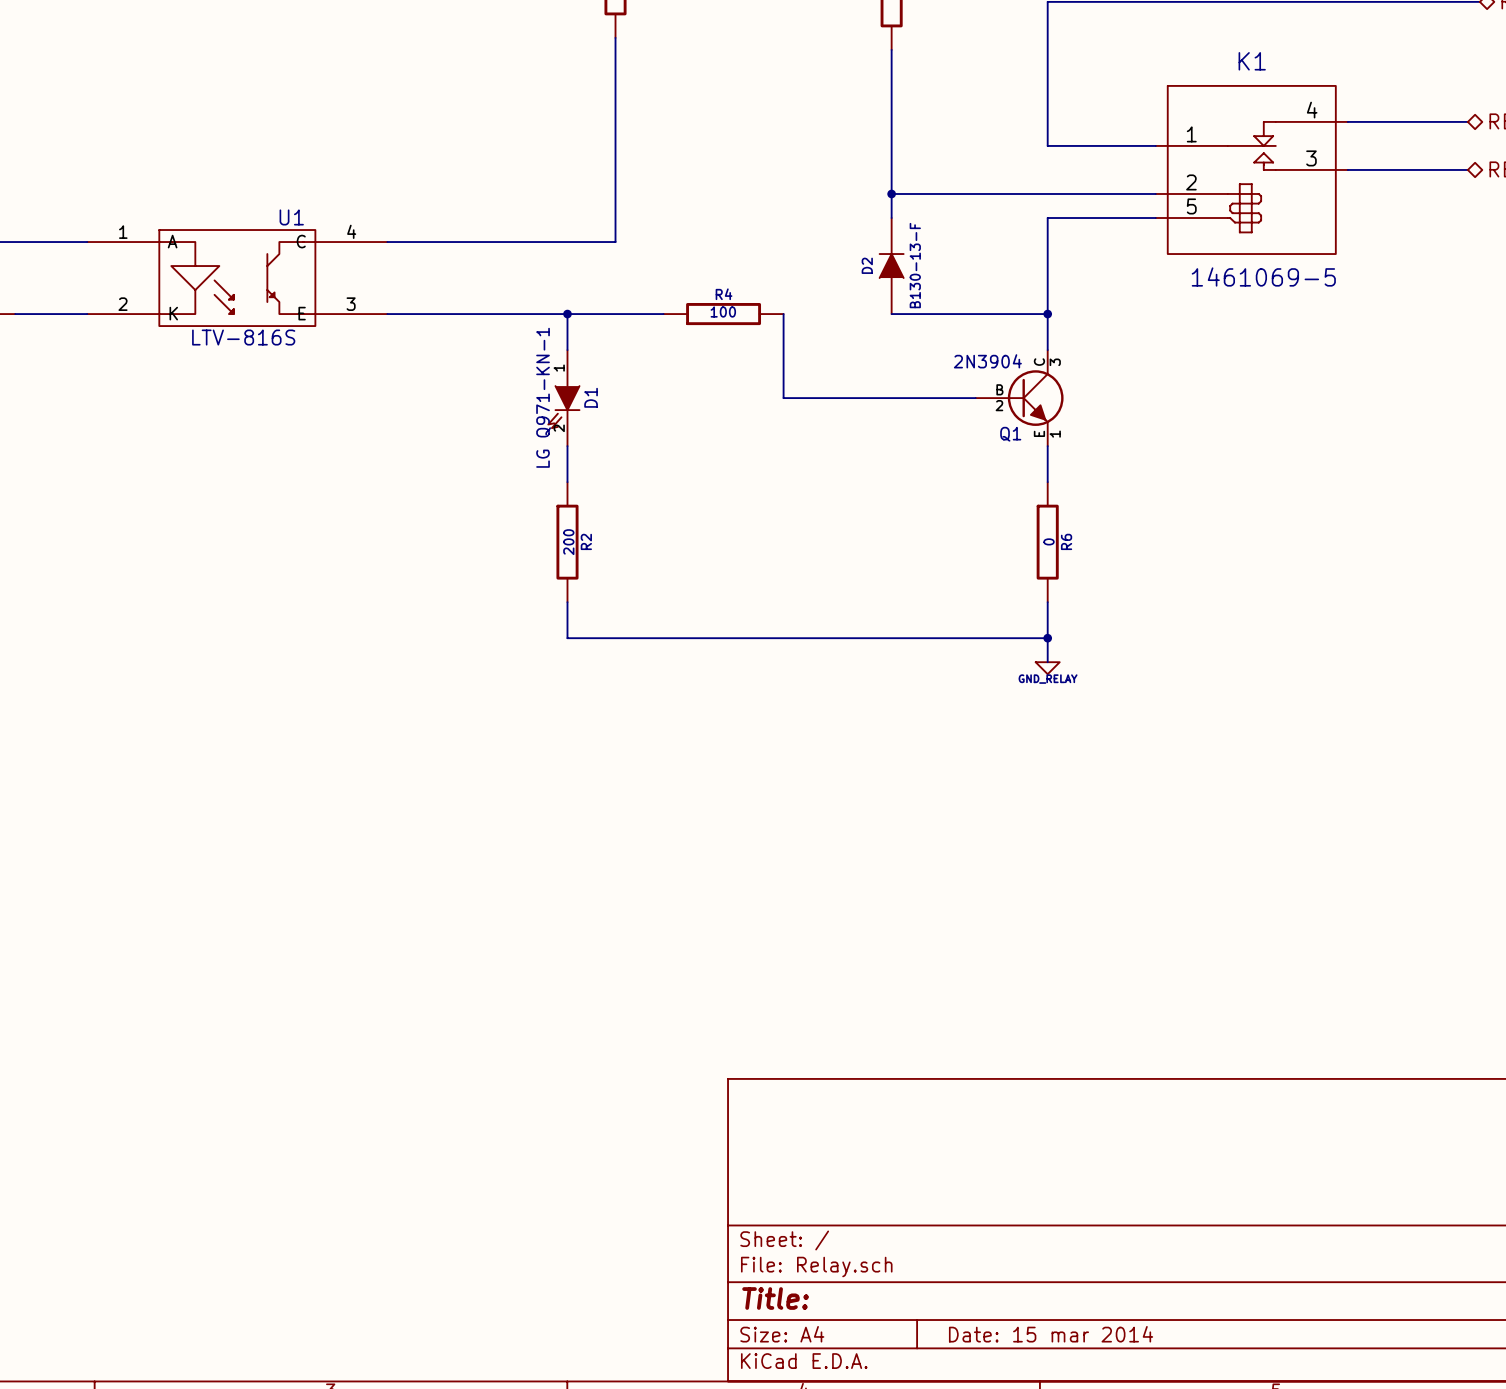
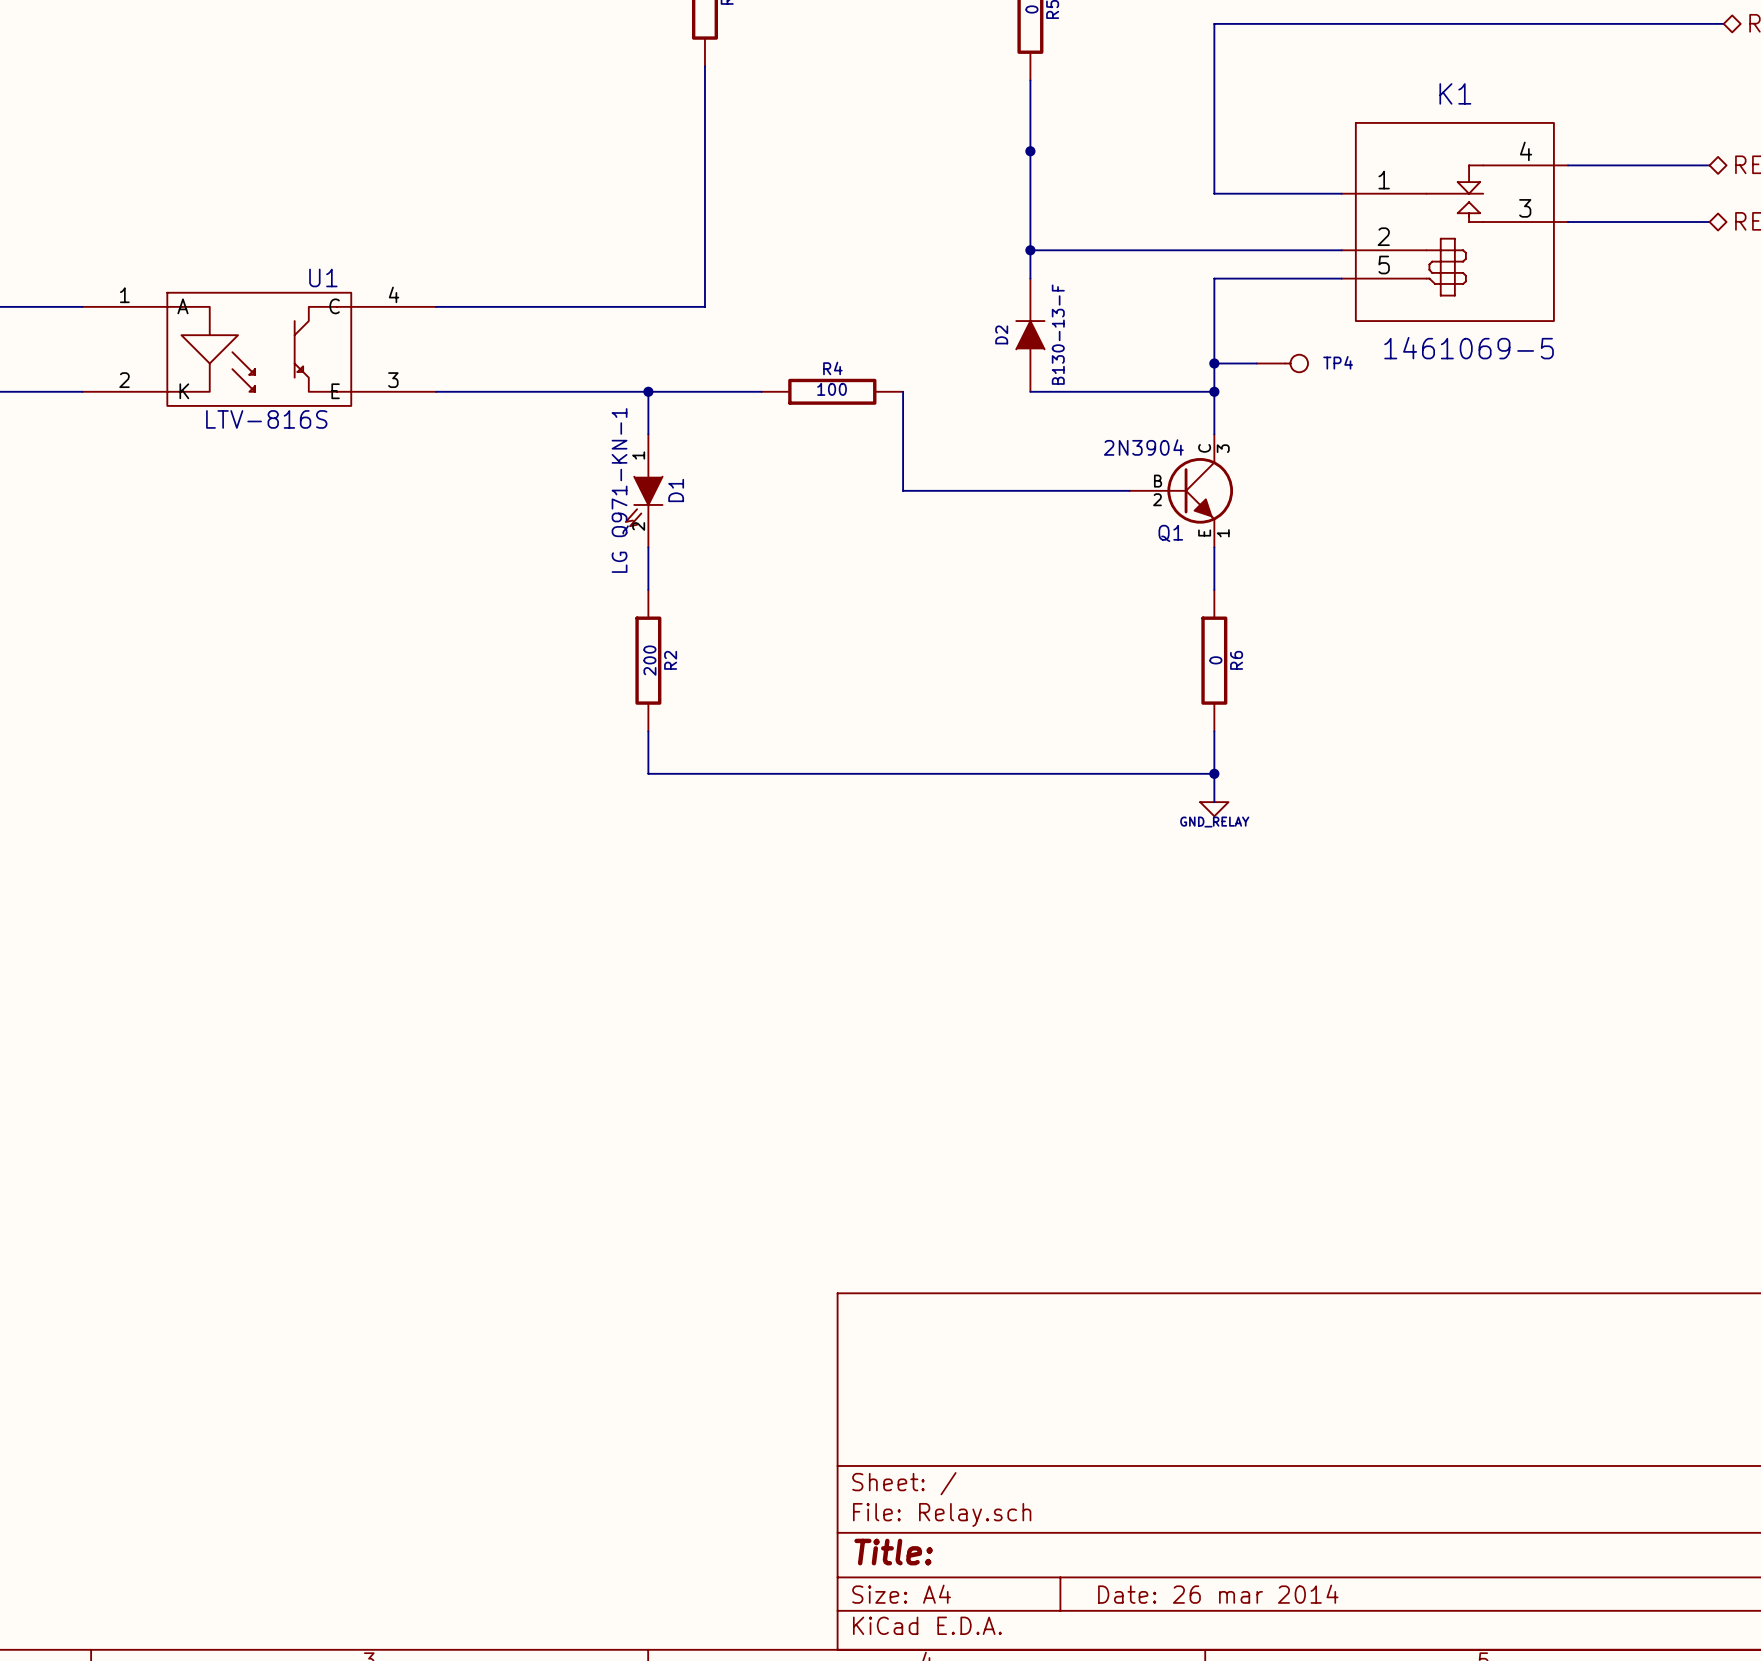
junction: none -> (1030, 151)
wire: none -> (1214, 363) (1256, 363)
junction: none -> (1214, 363)
TP4: none -> (1282, 363)
title block: Date: 15 mar 2014 (1051, 1334) -> Date: 26 mar 2014 (1218, 1594)

